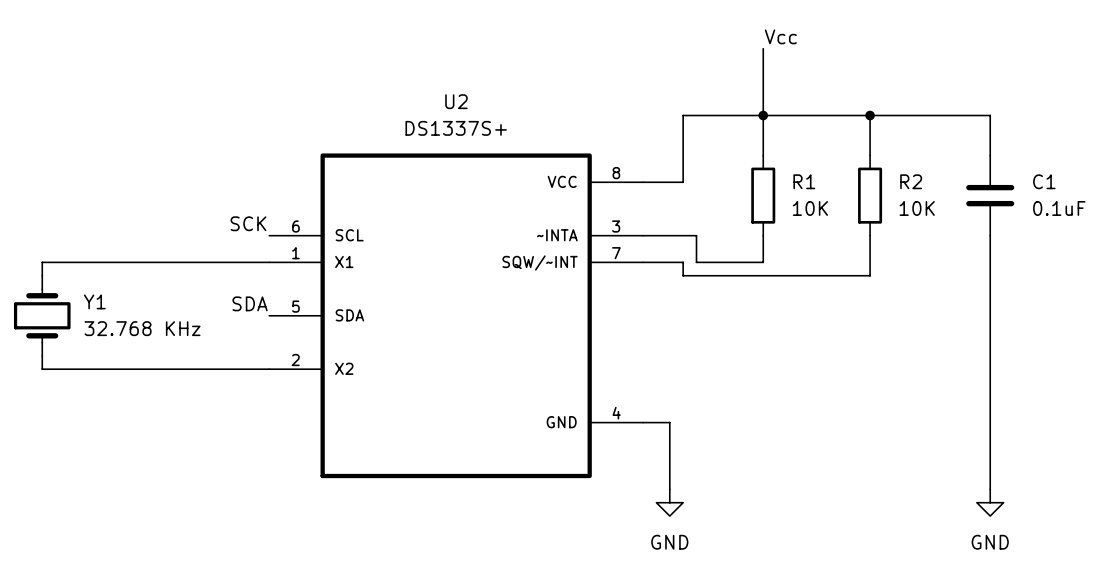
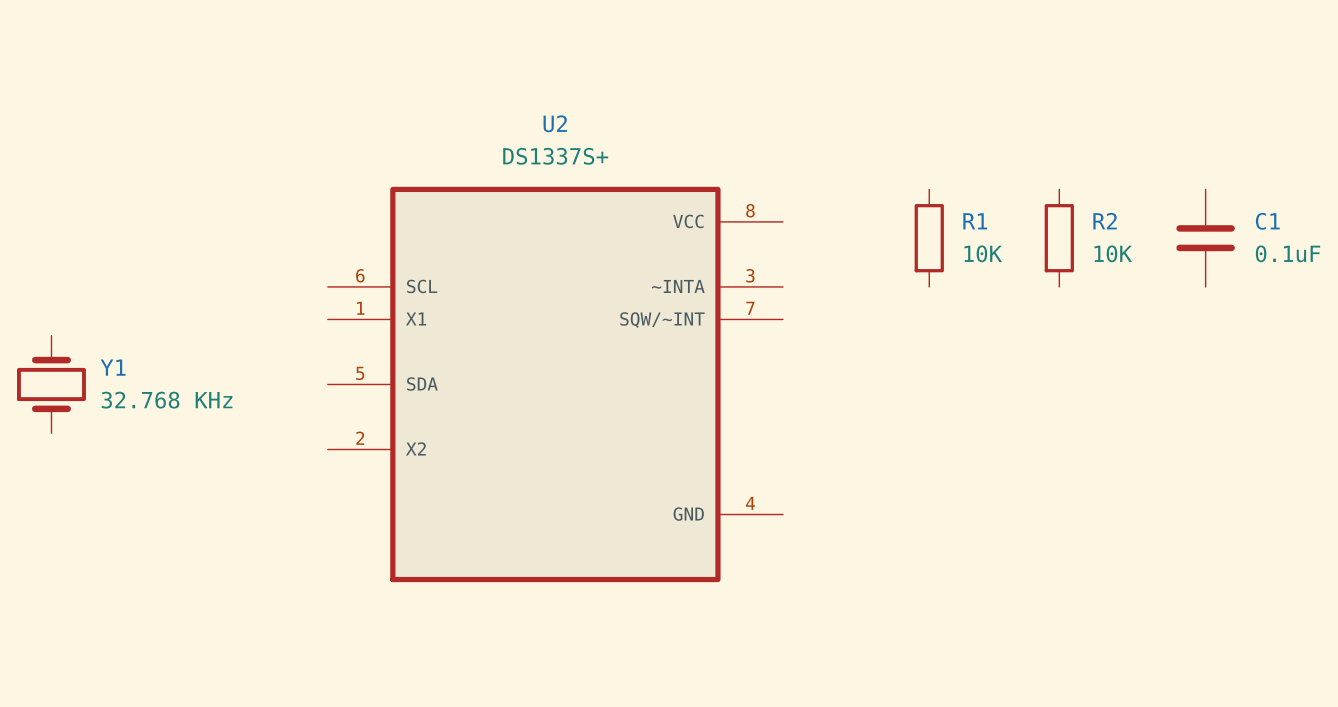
label: Vcc (780, 36) -> none
wire: (763, 48) (763, 155) -> none
junction: (763, 115) -> none
wire: (870, 115) (870, 155) -> none
junction: (870, 115) -> none
wire: (990, 155) (990, 115) (683, 115) (683, 182) (643, 182) -> none
label: SCK (248, 223) -> none
wire: (643, 235) (696, 235) (696, 262) (763, 262) (763, 235) -> none
wire: (870, 235) (870, 275) (683, 275) (683, 262) (643, 262) -> none
wire: (990, 235) (990, 489) -> none
wire: (269, 262) (42, 262) (42, 275) -> none
label: SDA (250, 303) -> none
wire: (42, 355) (42, 369) (269, 369) -> none
wire: (643, 422) (669, 422) (669, 489) -> none
power symbol: GND (669, 502) -> none
power symbol: GND (990, 502) -> none

